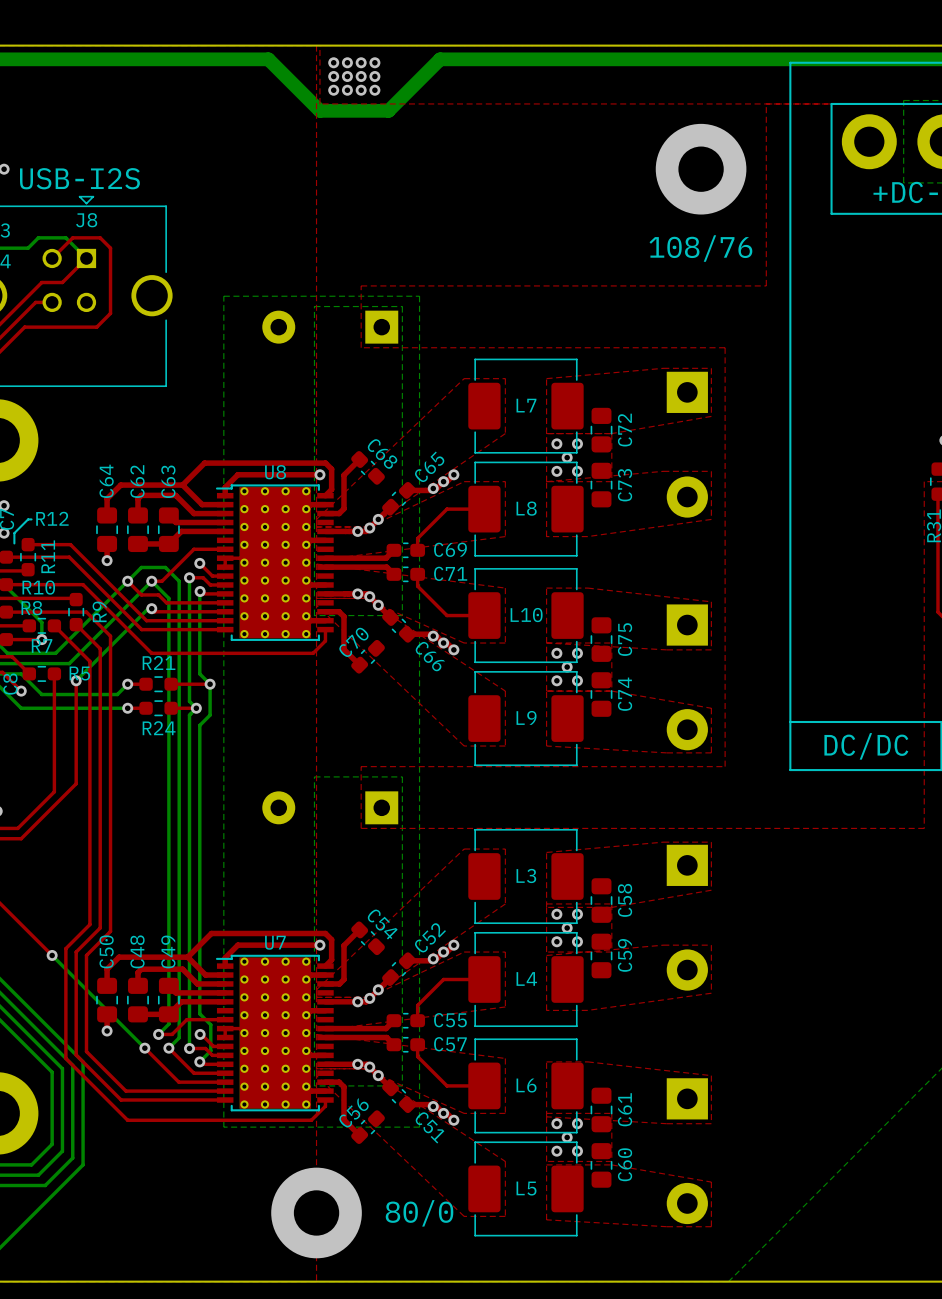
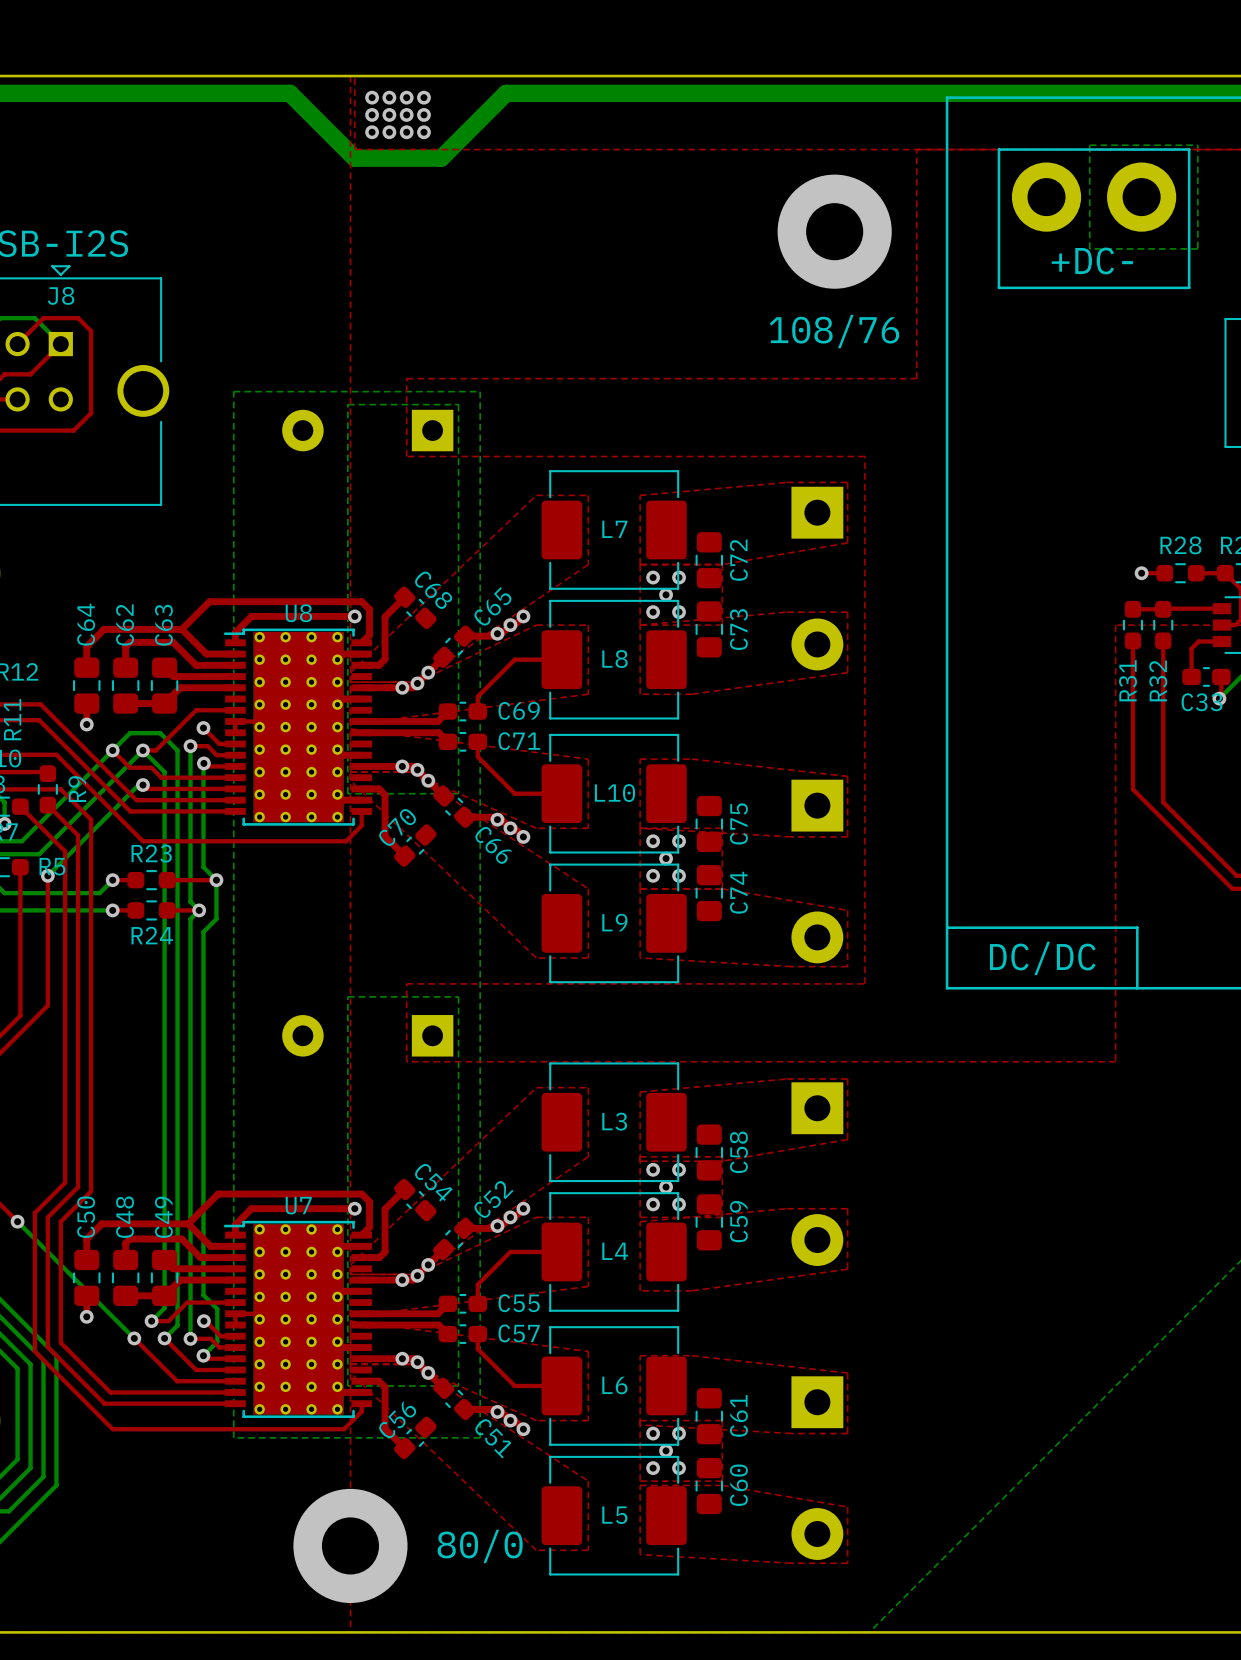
R21 name: R21 (159, 662) -> R23 (151, 853)

